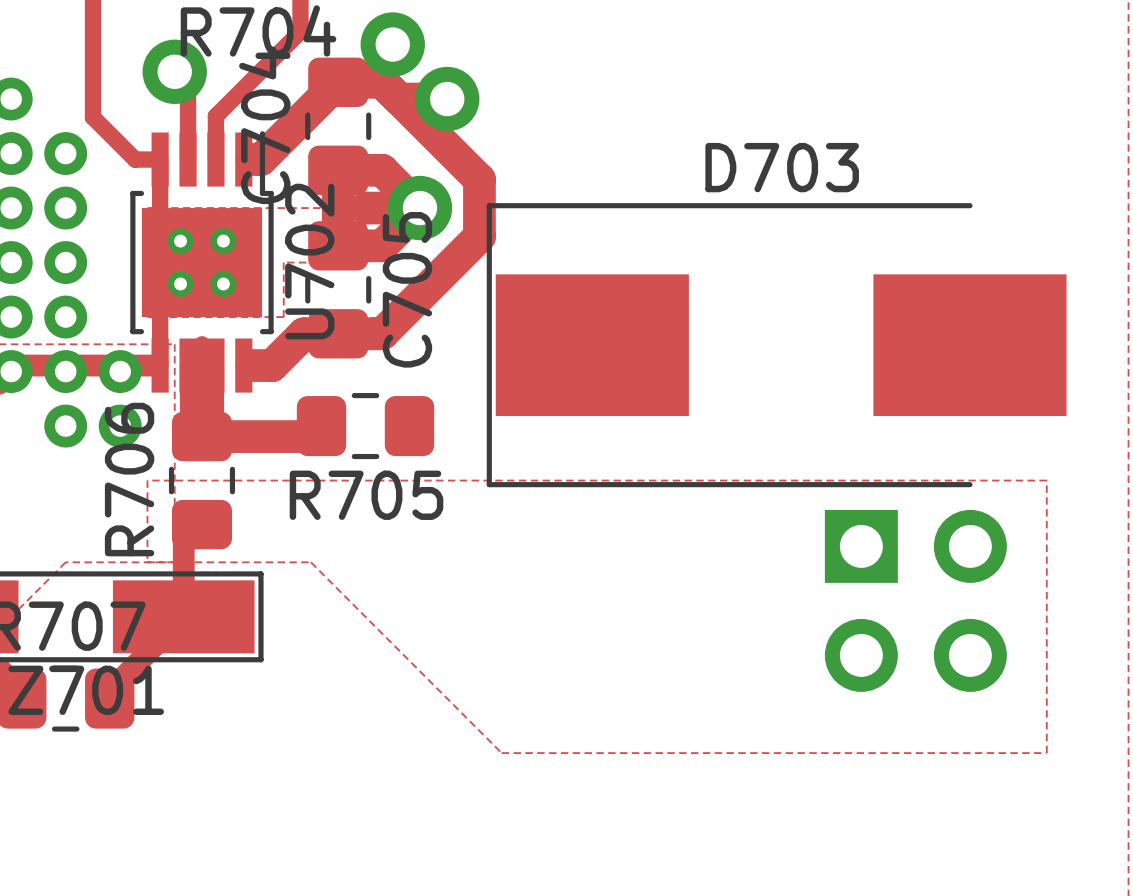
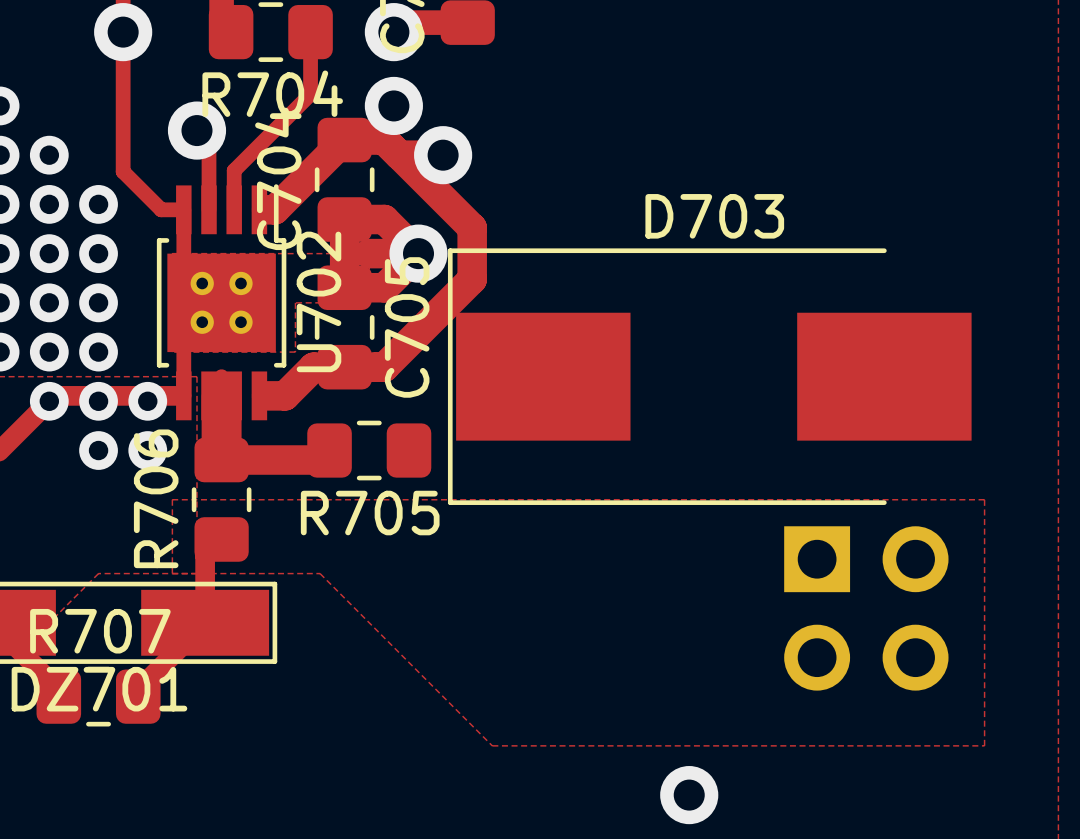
D703 position: (776, 345) -> (709, 376)
via: none -> (689, 795)

